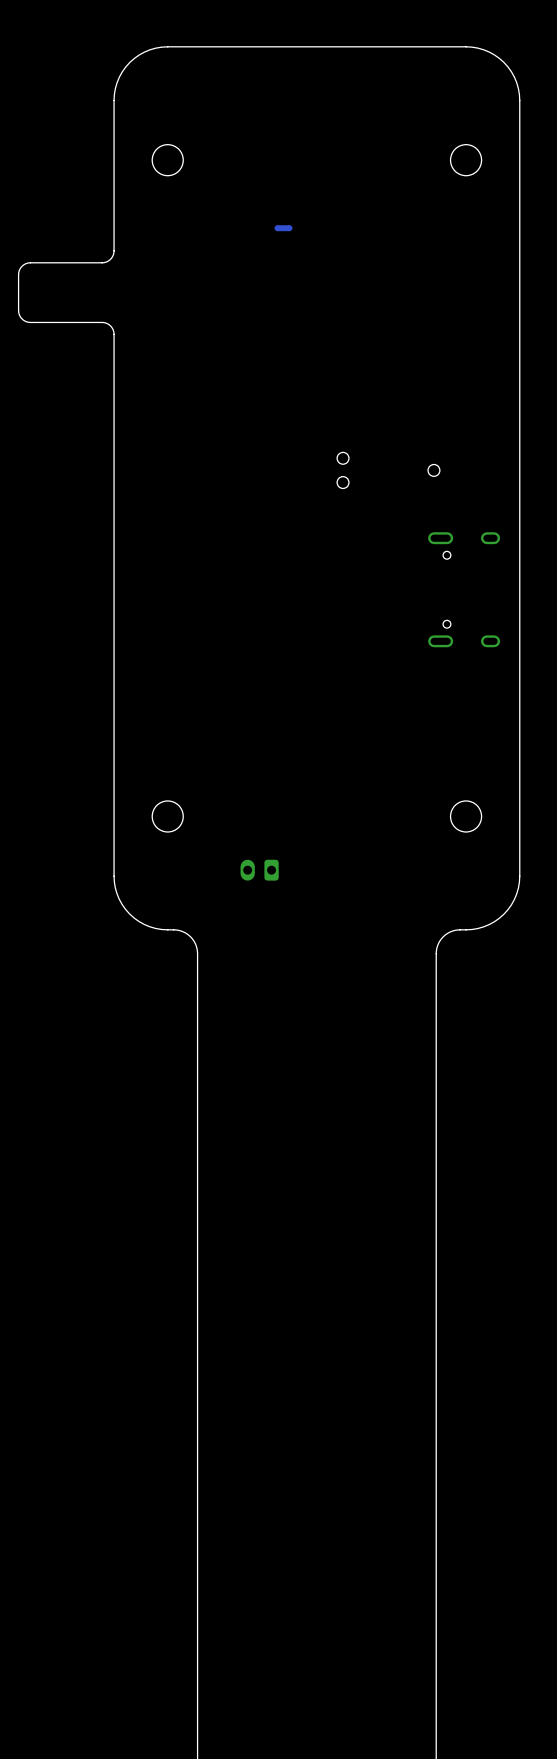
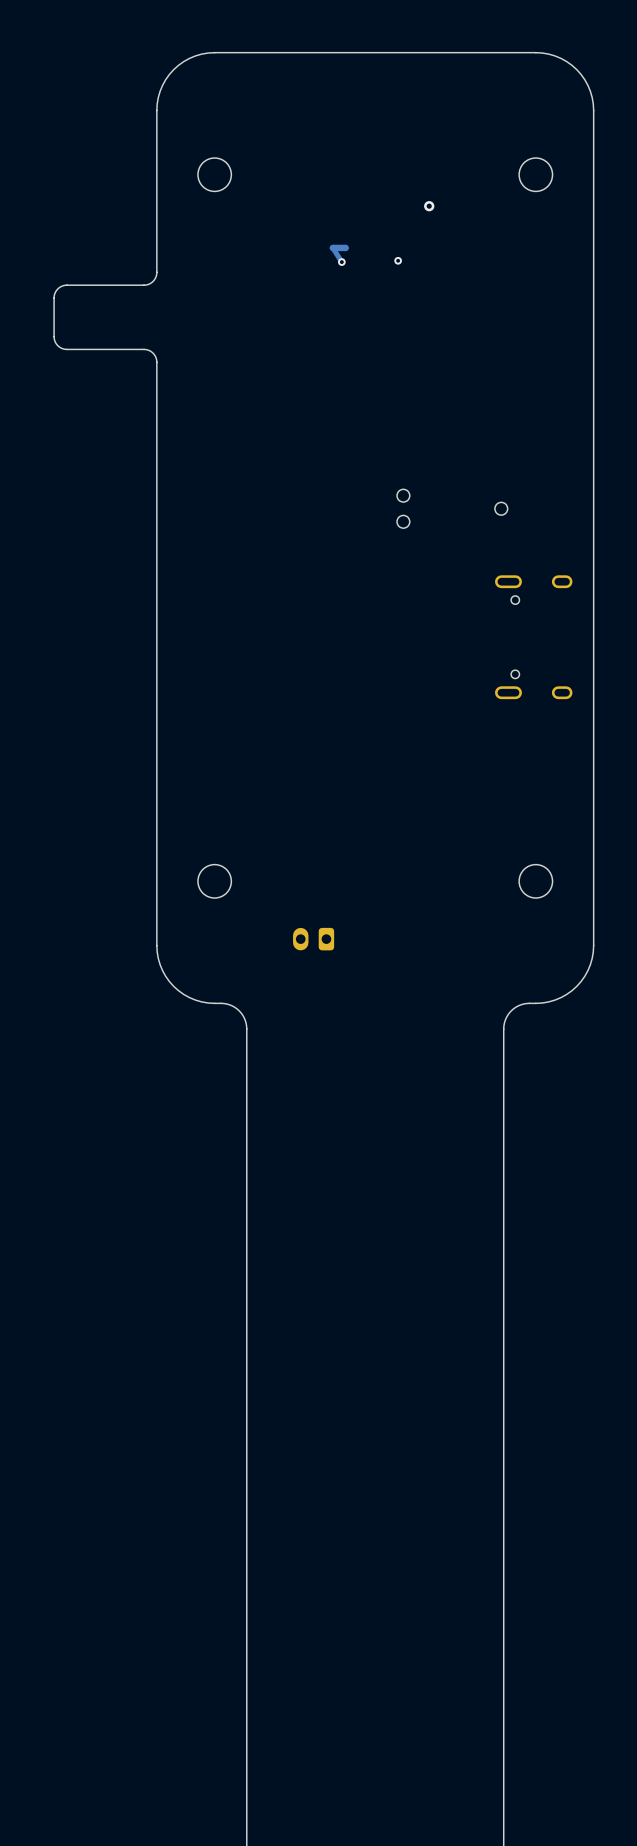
via: none -> (429, 206)
track: none -> (332, 247) (341, 262)
via: none -> (398, 260)
via: none -> (341, 262)

